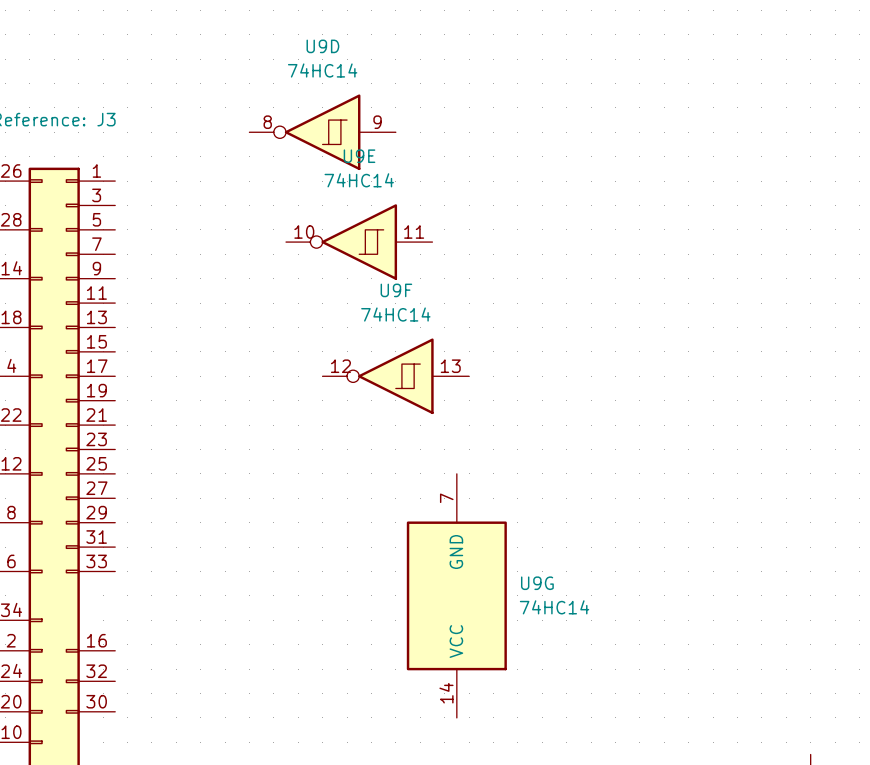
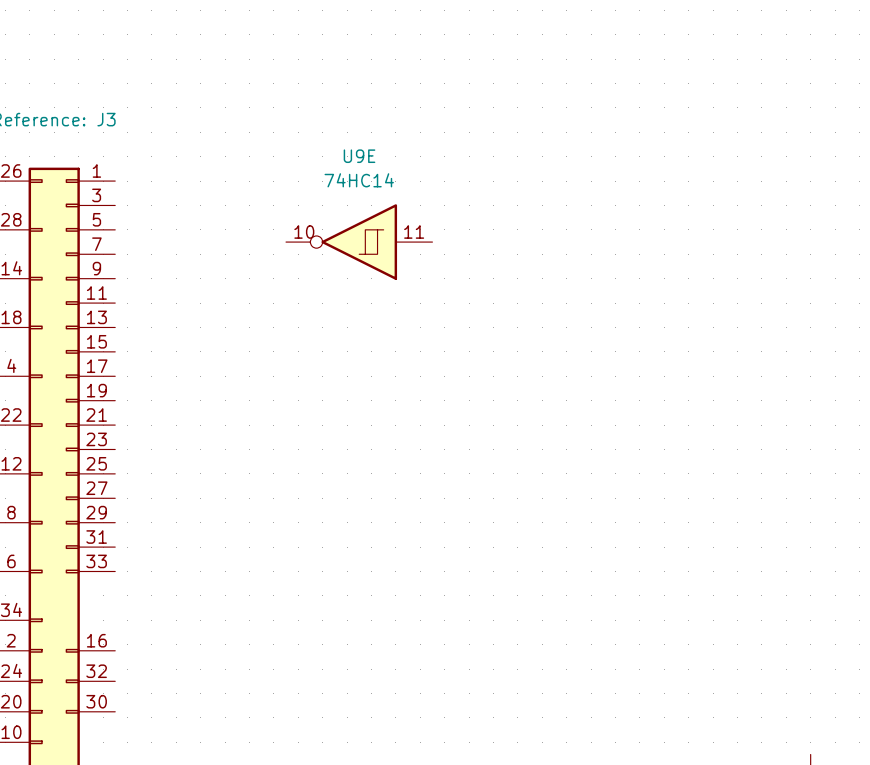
U9D: 74HC14 (322, 132) -> none
U9F: 74HC14 (395, 376) -> none
U9G: 74HC14 (456, 595) -> none

